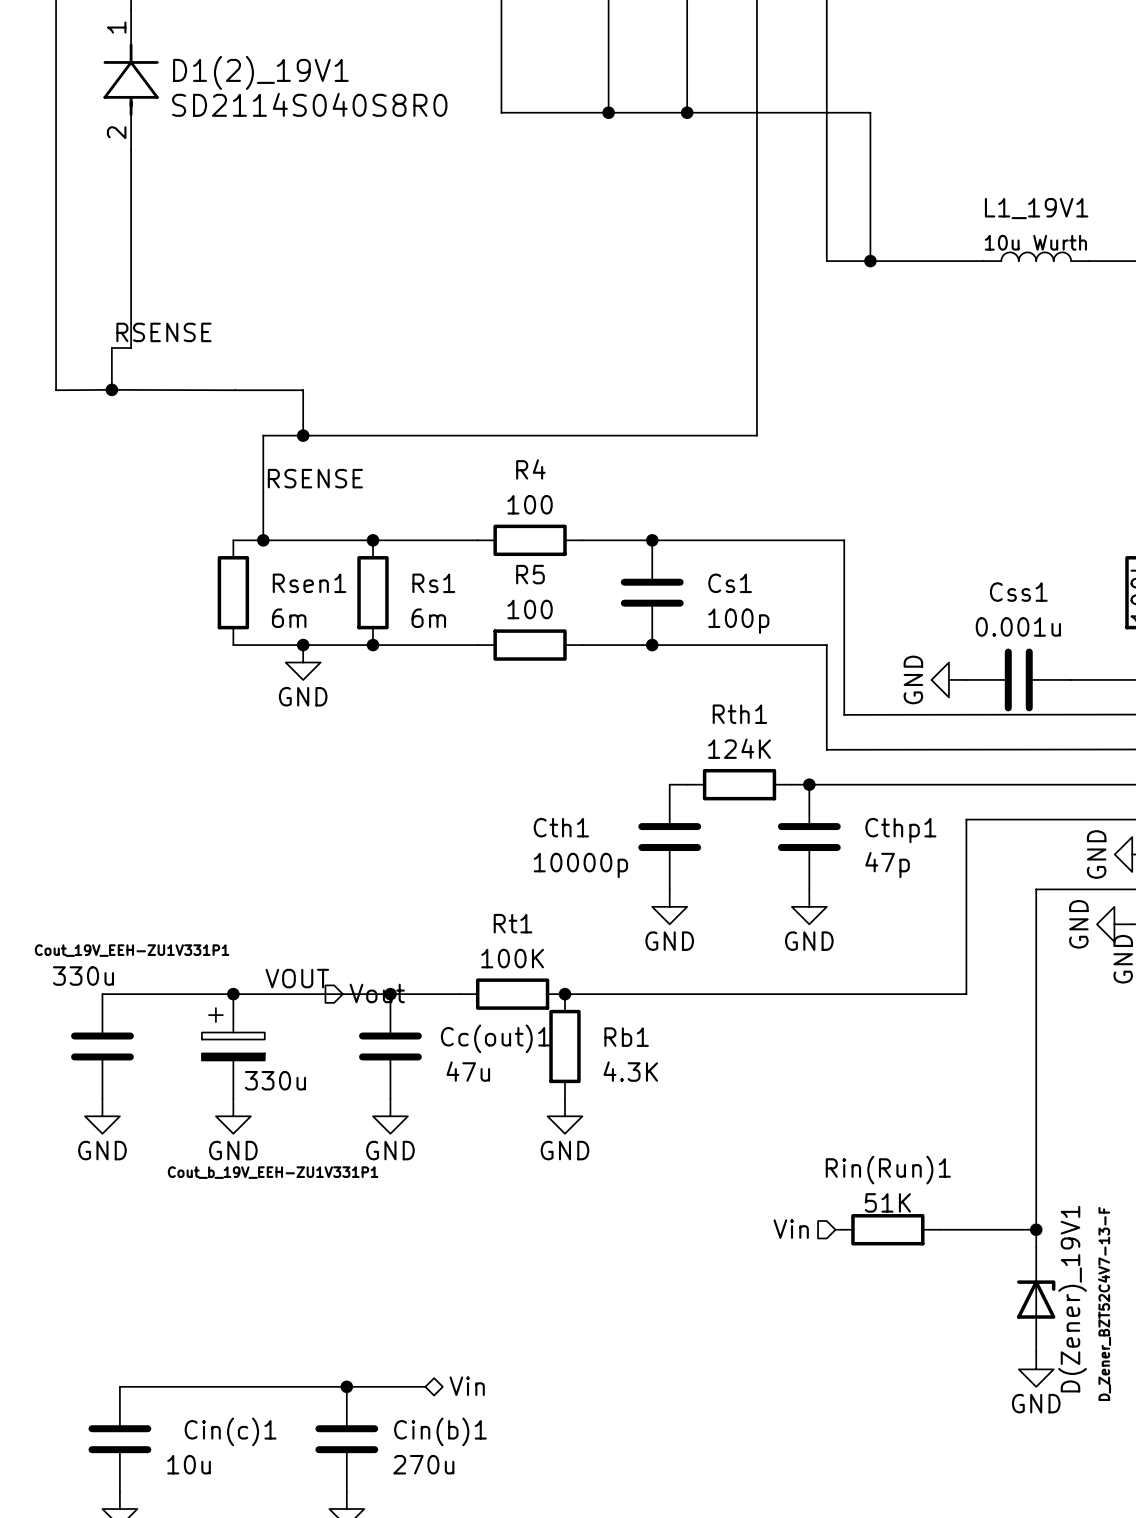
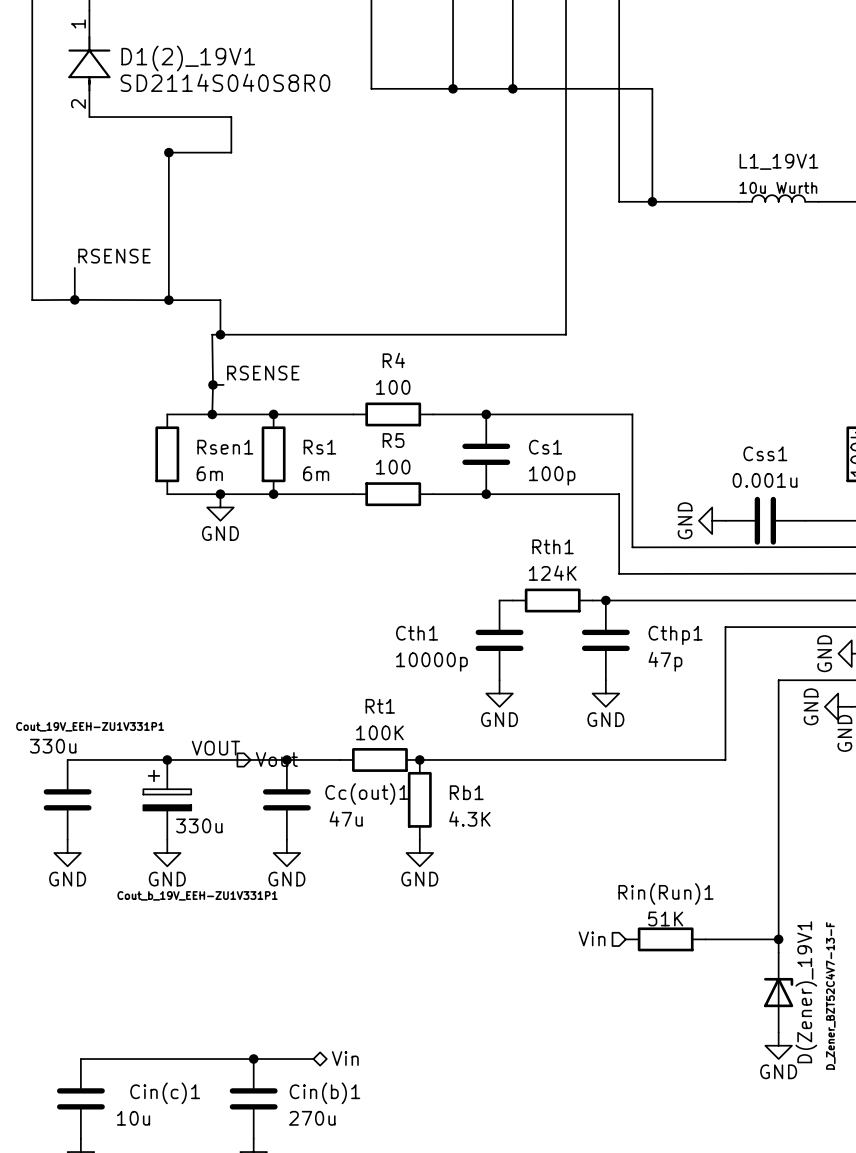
wire: (131, 149) (131, 348) (111, 348) -> (89, 117) (231, 117) (231, 152) (168, 152)
wire: none -> (168, 152) (168, 300)
junction: none -> (168, 152)
junction: none -> (168, 300)
wire: (292, 435) (263, 435) (263, 540) -> (212, 334) (213, 384)
label position: RSENSE (315, 478) -> RSENSE (263, 373)
wire: none -> (213, 384) (212, 414)
wire: none -> (213, 384) (223, 384)
junction: none -> (213, 384)
junction: (263, 540) -> none
junction: none -> (212, 414)

